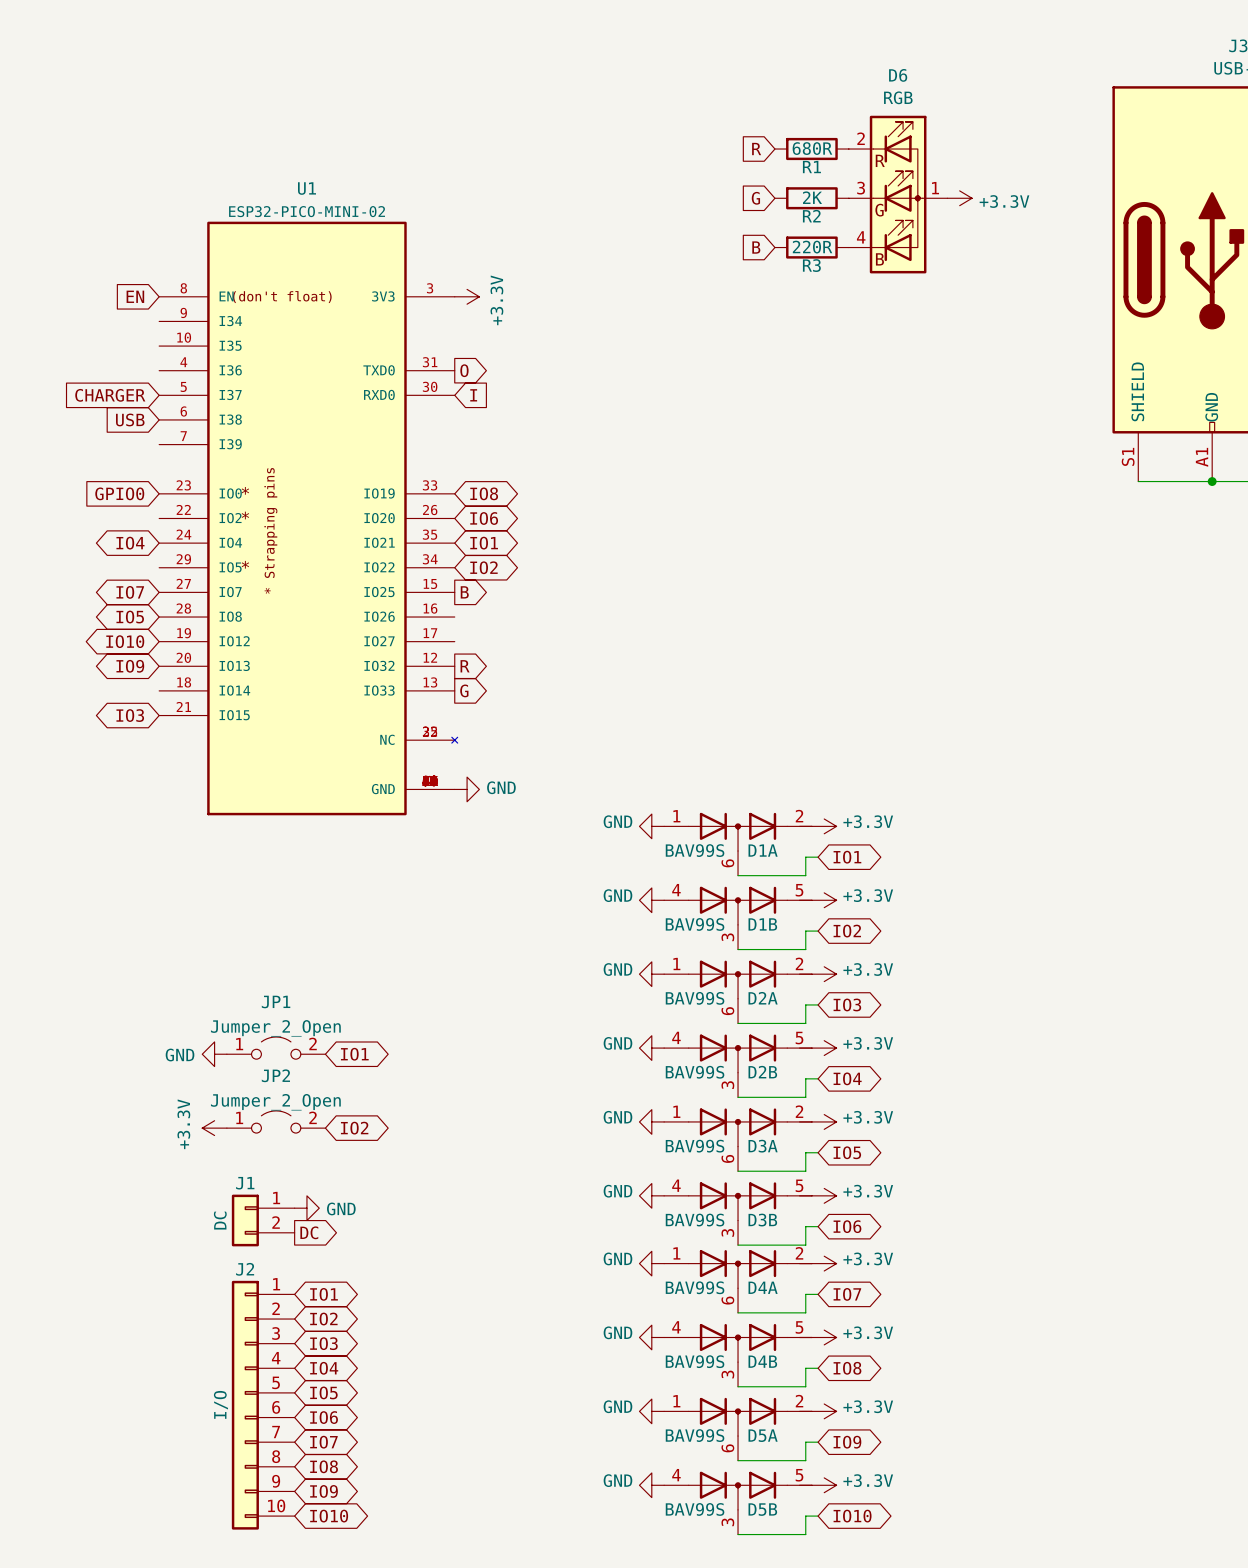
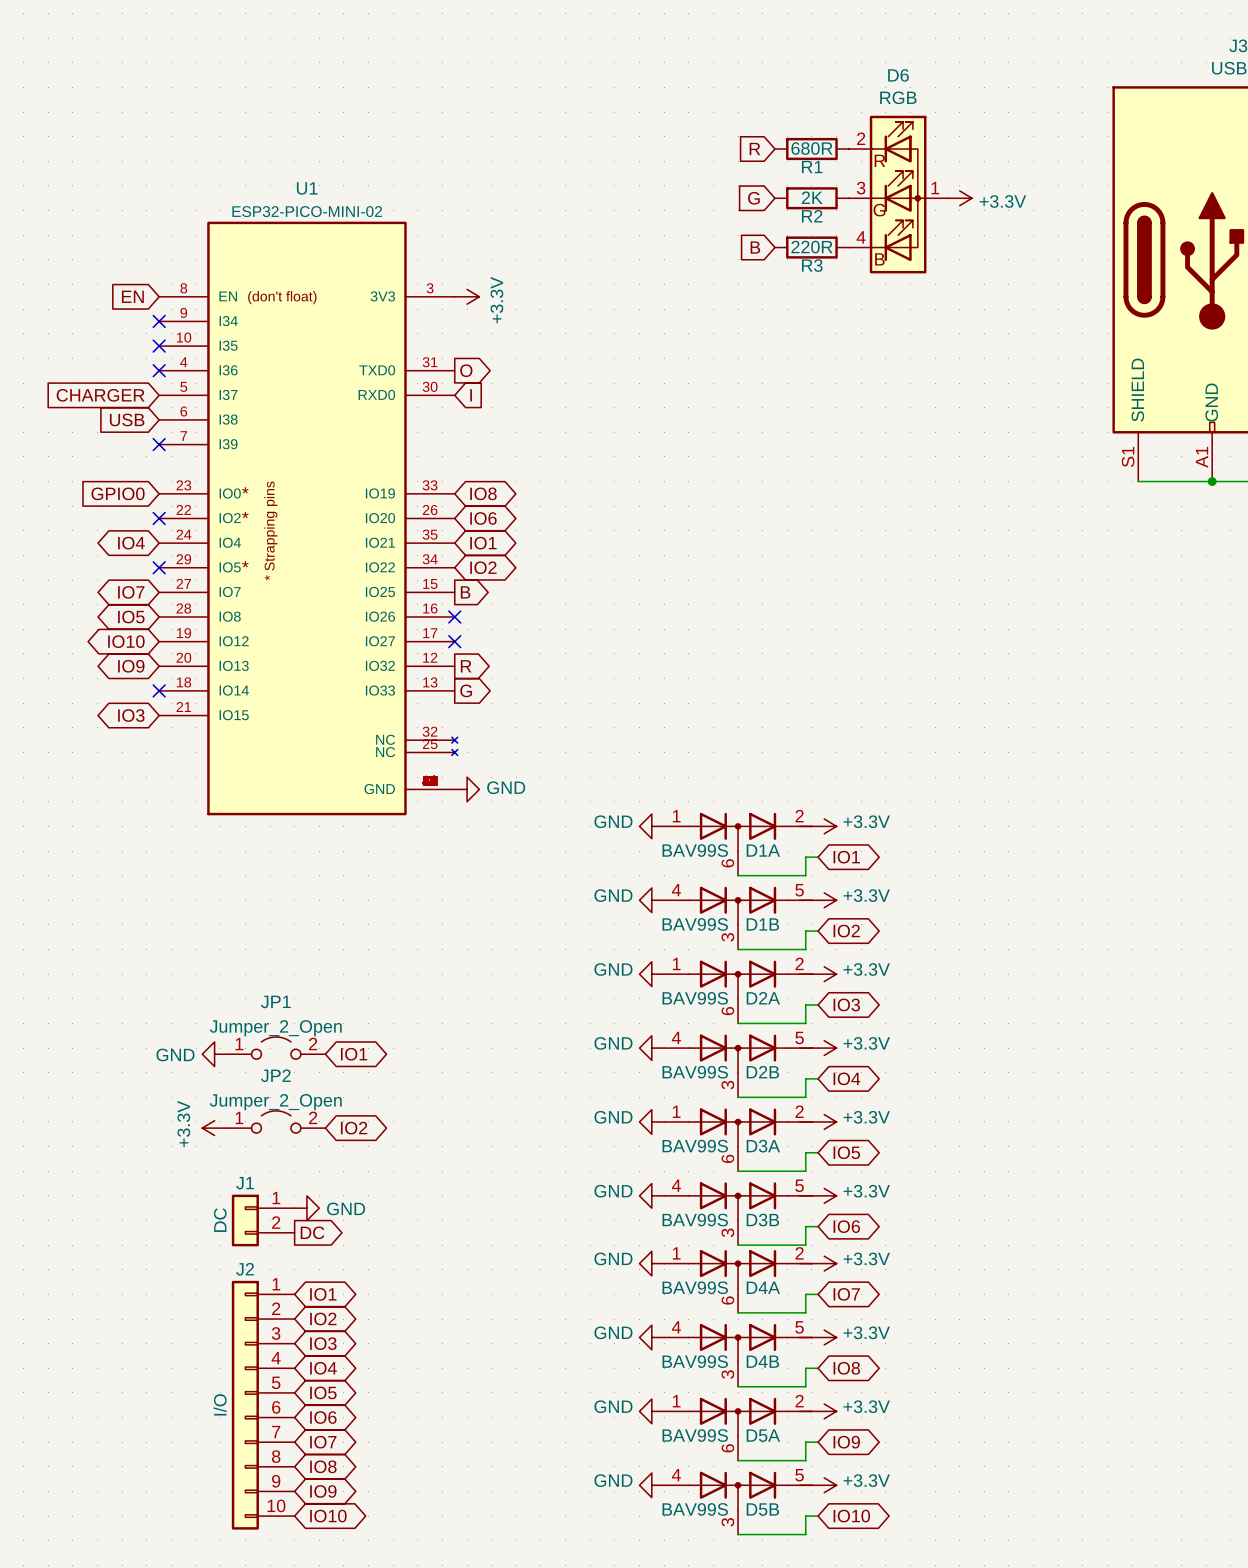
U1 symbol: [159, 221, 458, 816] -> [159, 221, 458, 816]
no-connect mark: none -> (159, 321)
no-connect mark: none -> (159, 346)
no-connect mark: none -> (159, 370)
no-connect mark: none -> (159, 444)
no-connect mark: none -> (159, 518)
no-connect mark: none -> (159, 567)
no-connect mark: none -> (454, 617)
no-connect mark: none -> (454, 641)
no-connect mark: none -> (159, 690)

